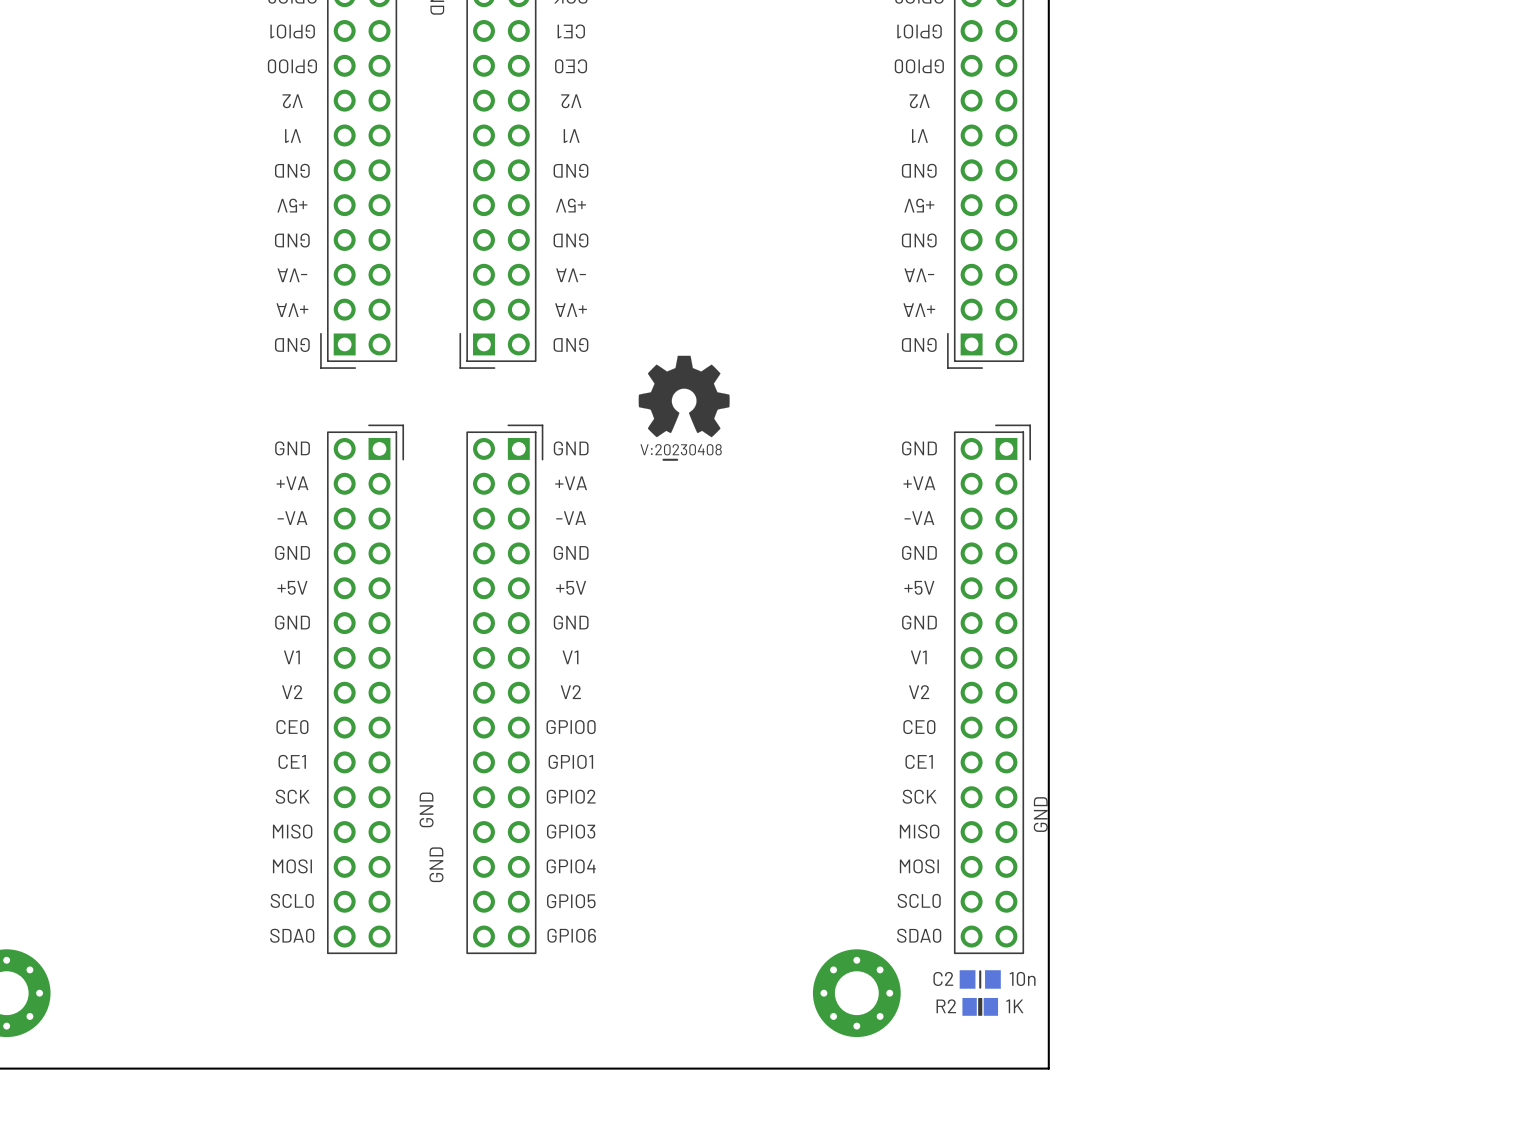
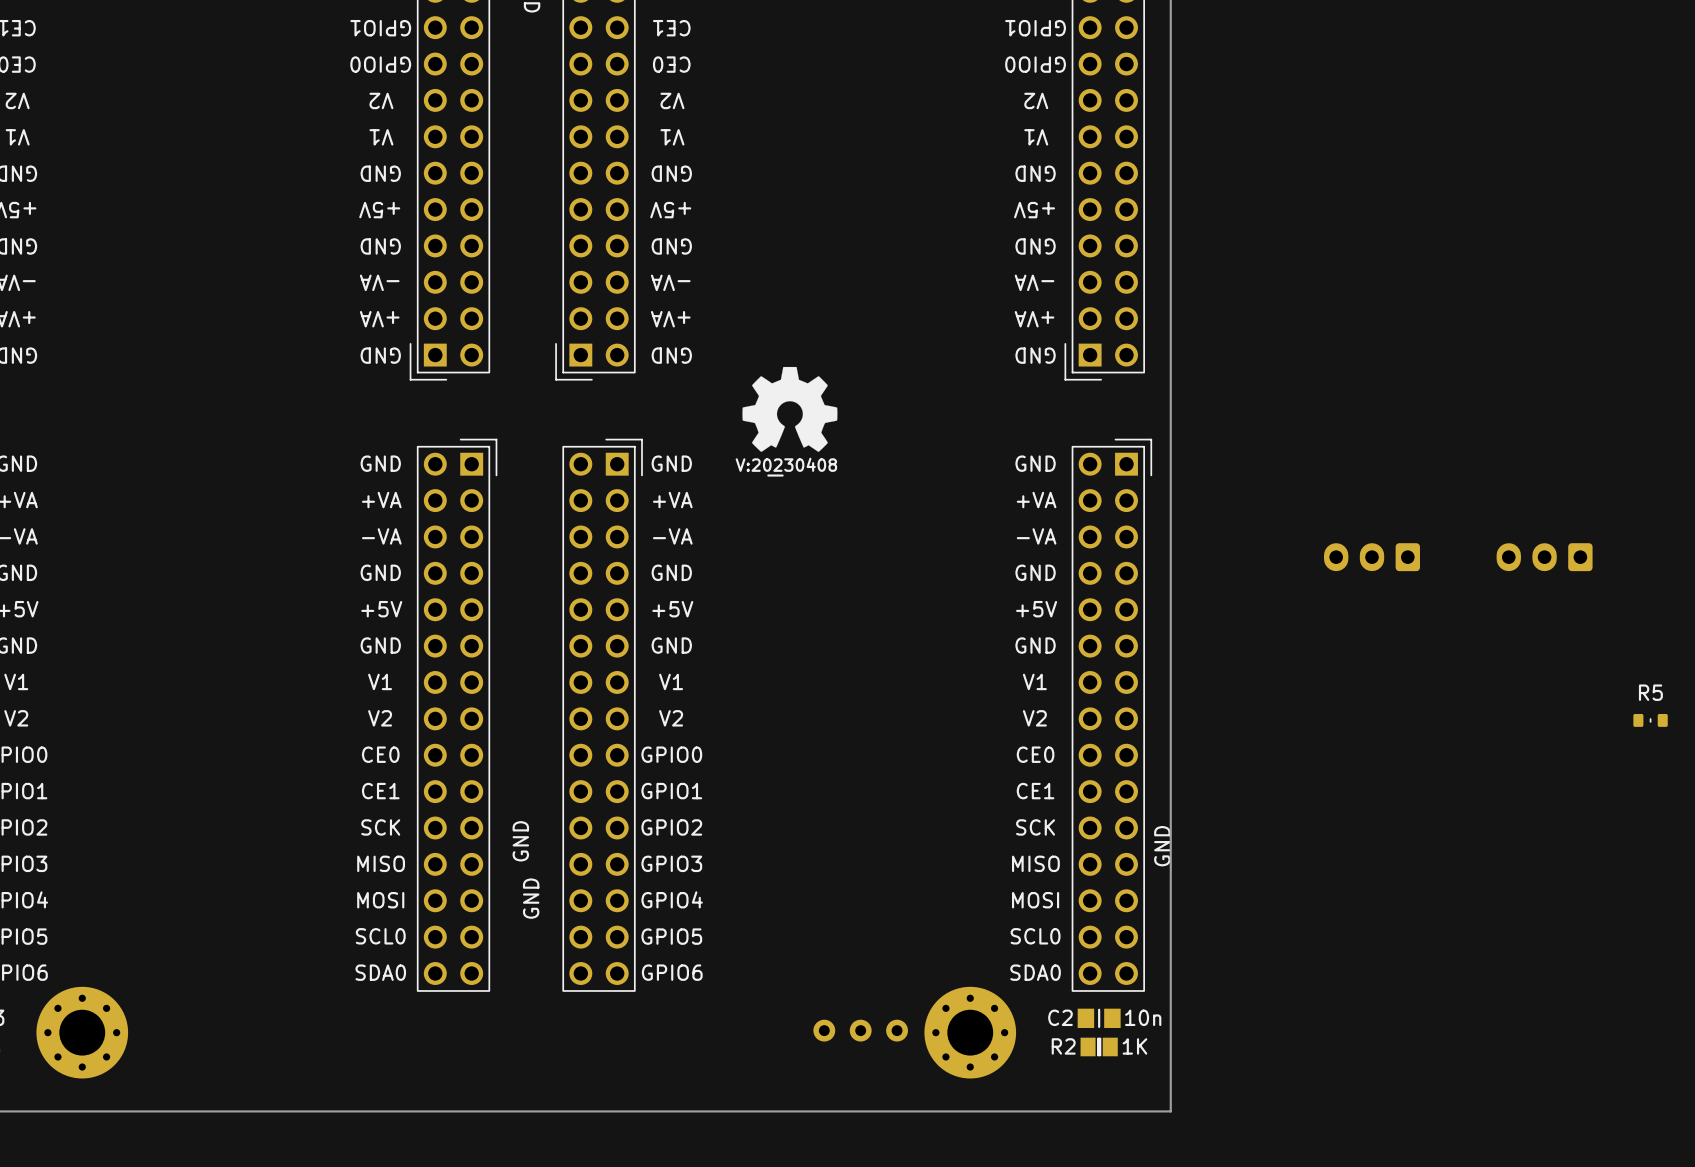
part: none -> (1371, 557)
part: none -> (1544, 557)
R5: none -> (1650, 720)
part: none -> (860, 1030)

